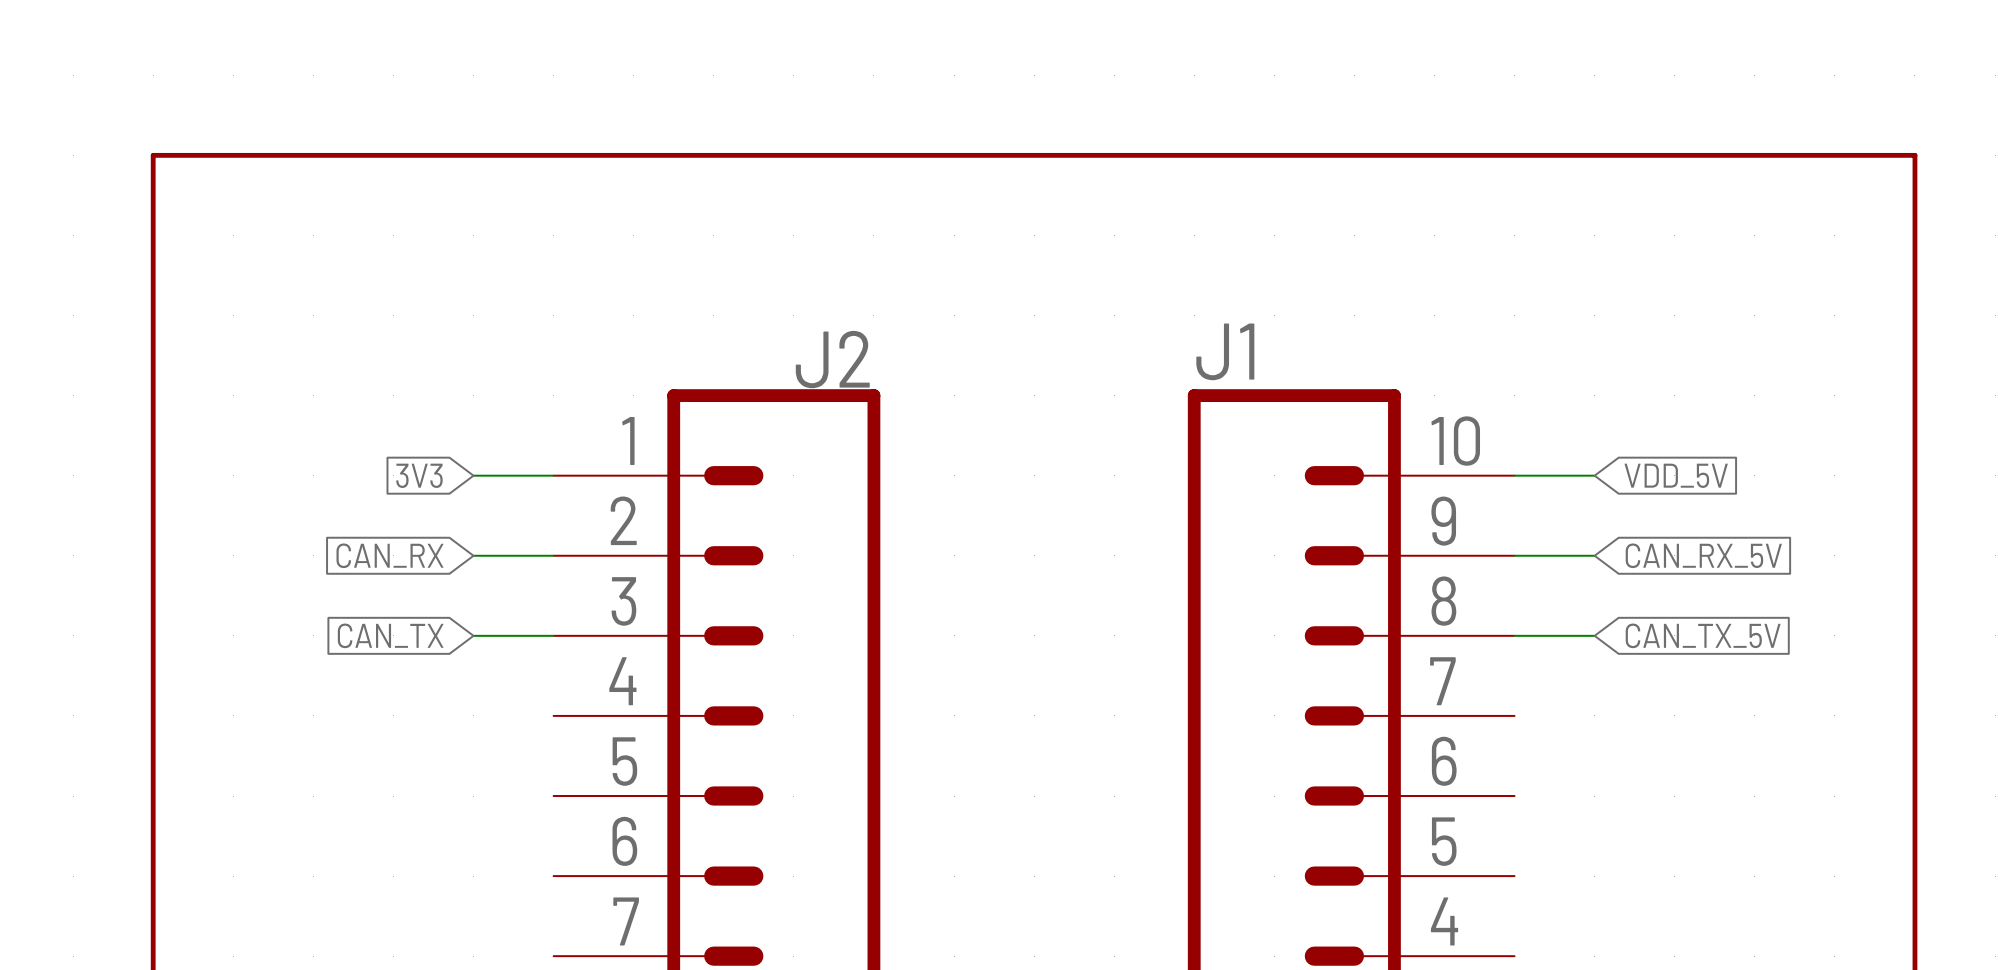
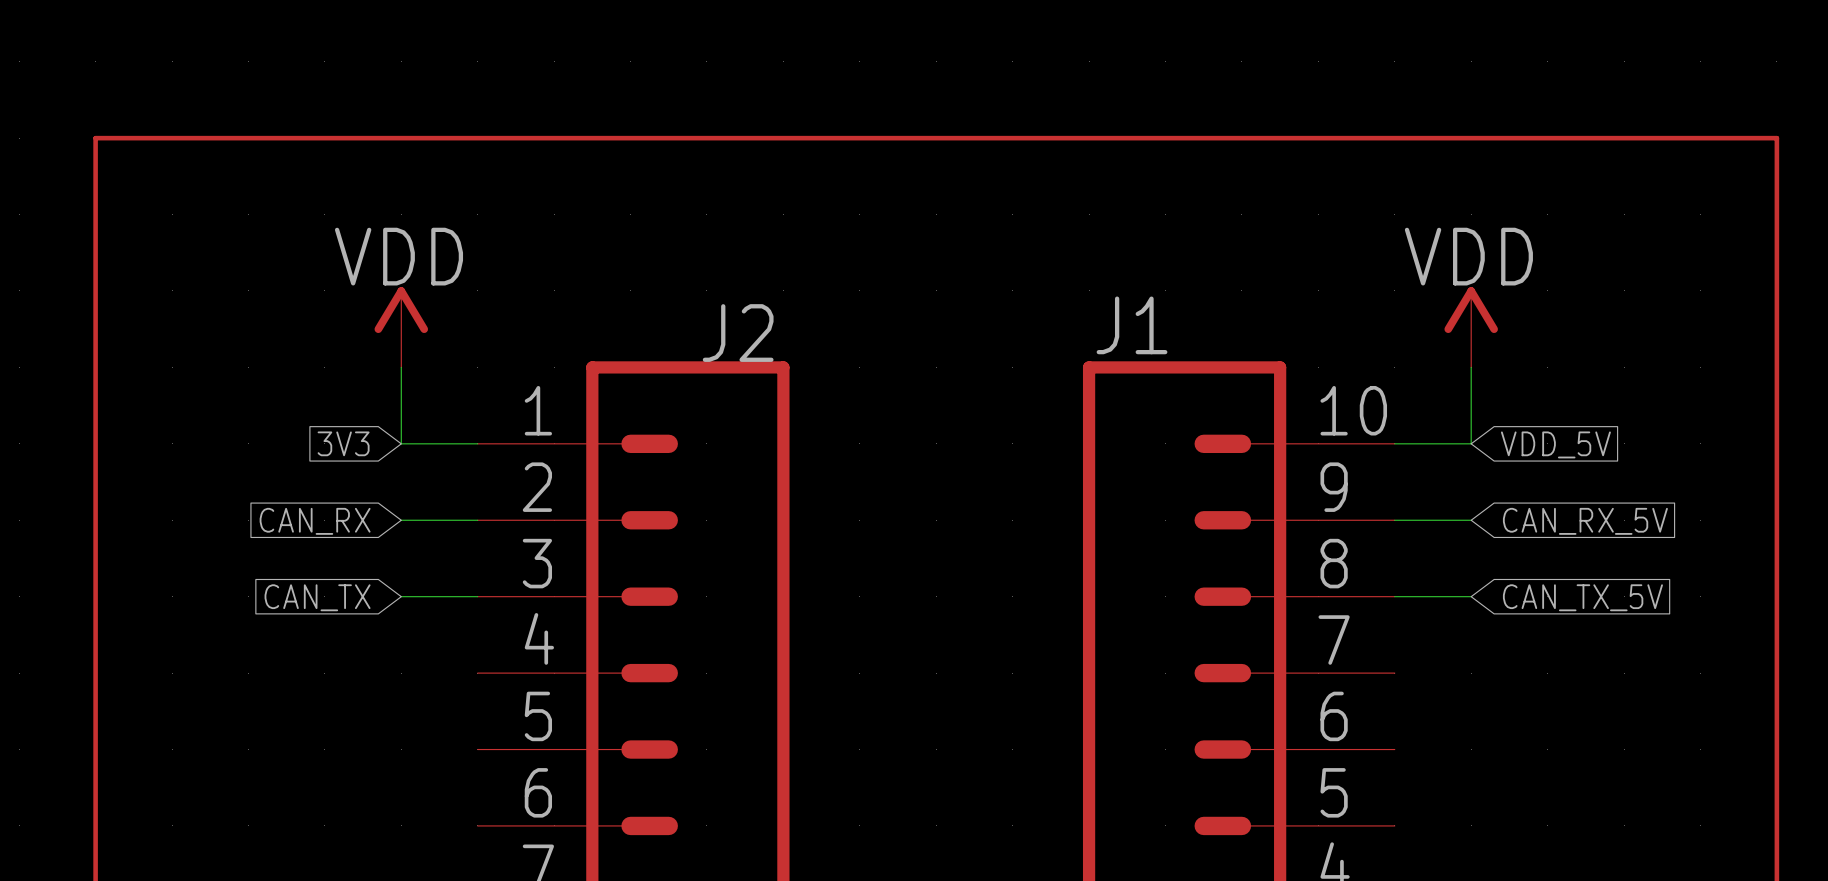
power symbol: none -> VDD (401, 327)
power symbol: none -> VDD (1471, 327)
wire: none -> (401, 367) (401, 443)
wire: none -> (1471, 367) (1471, 443)

